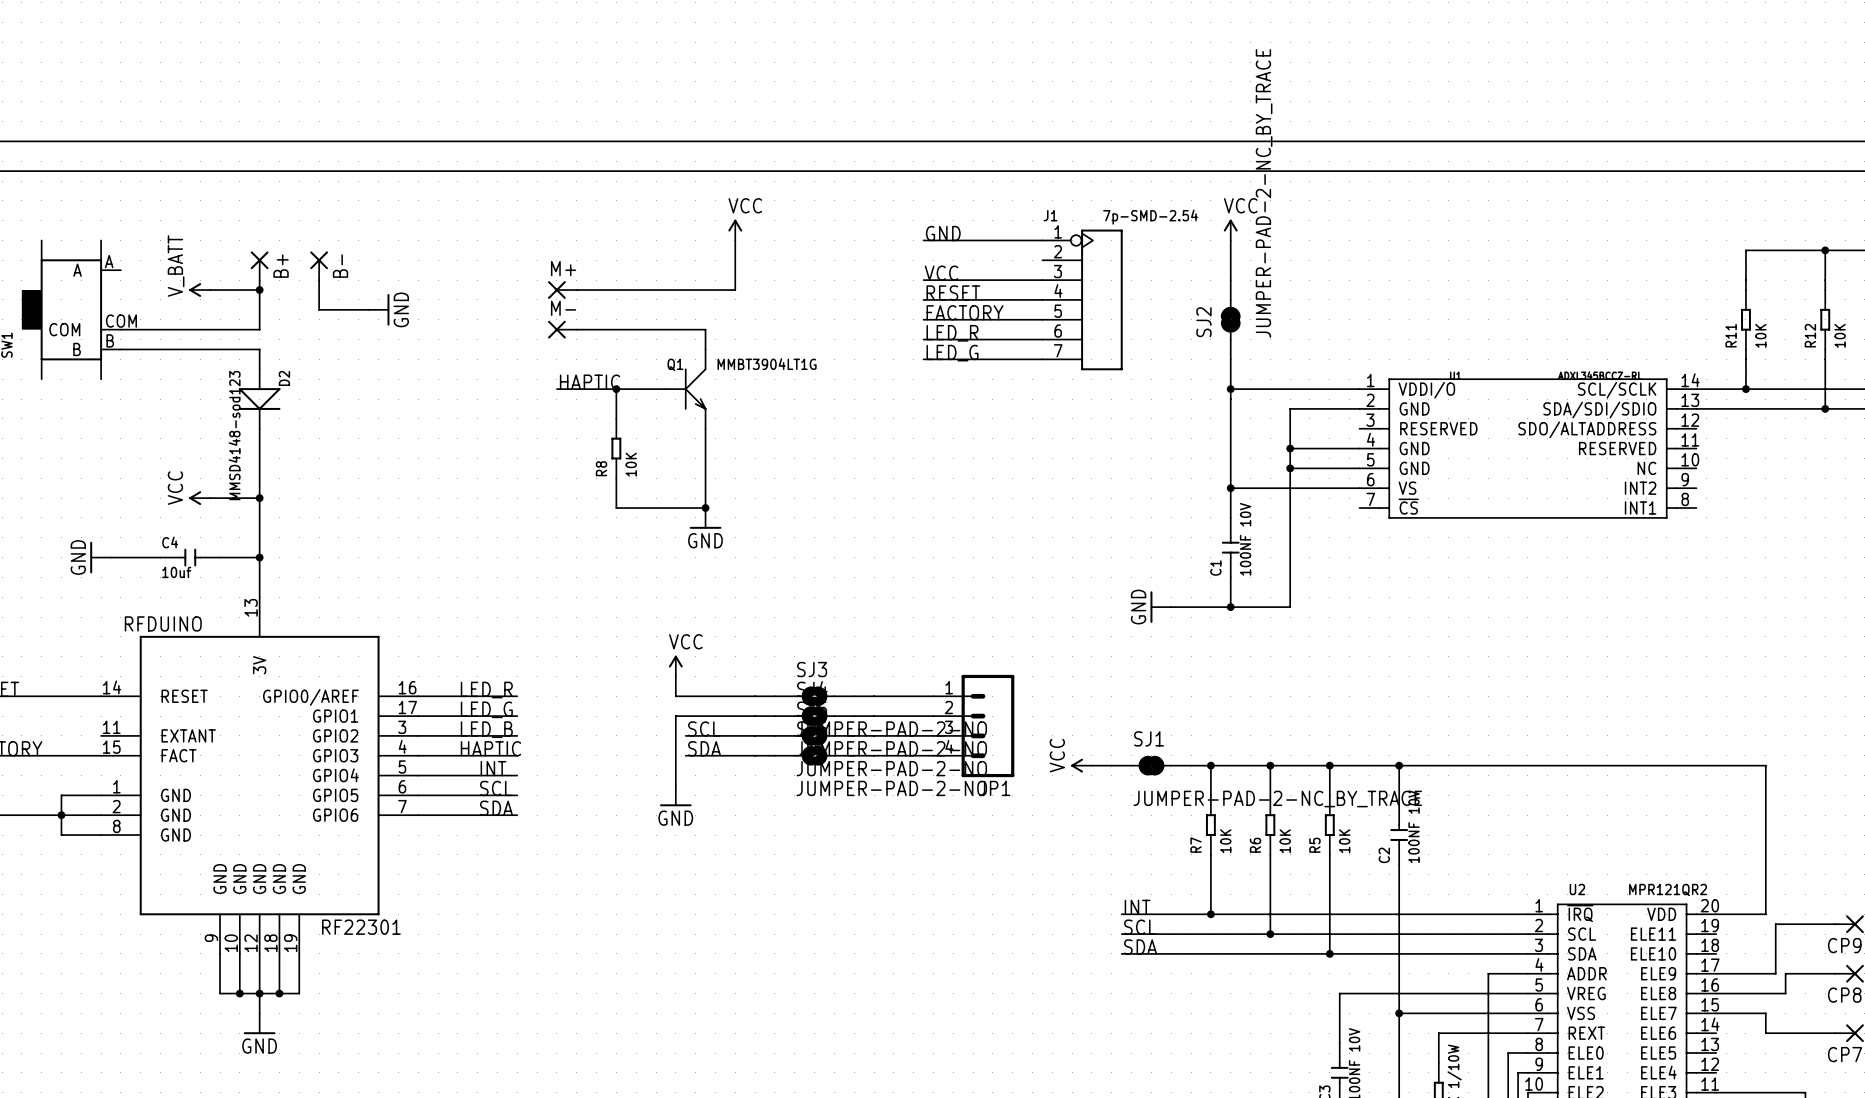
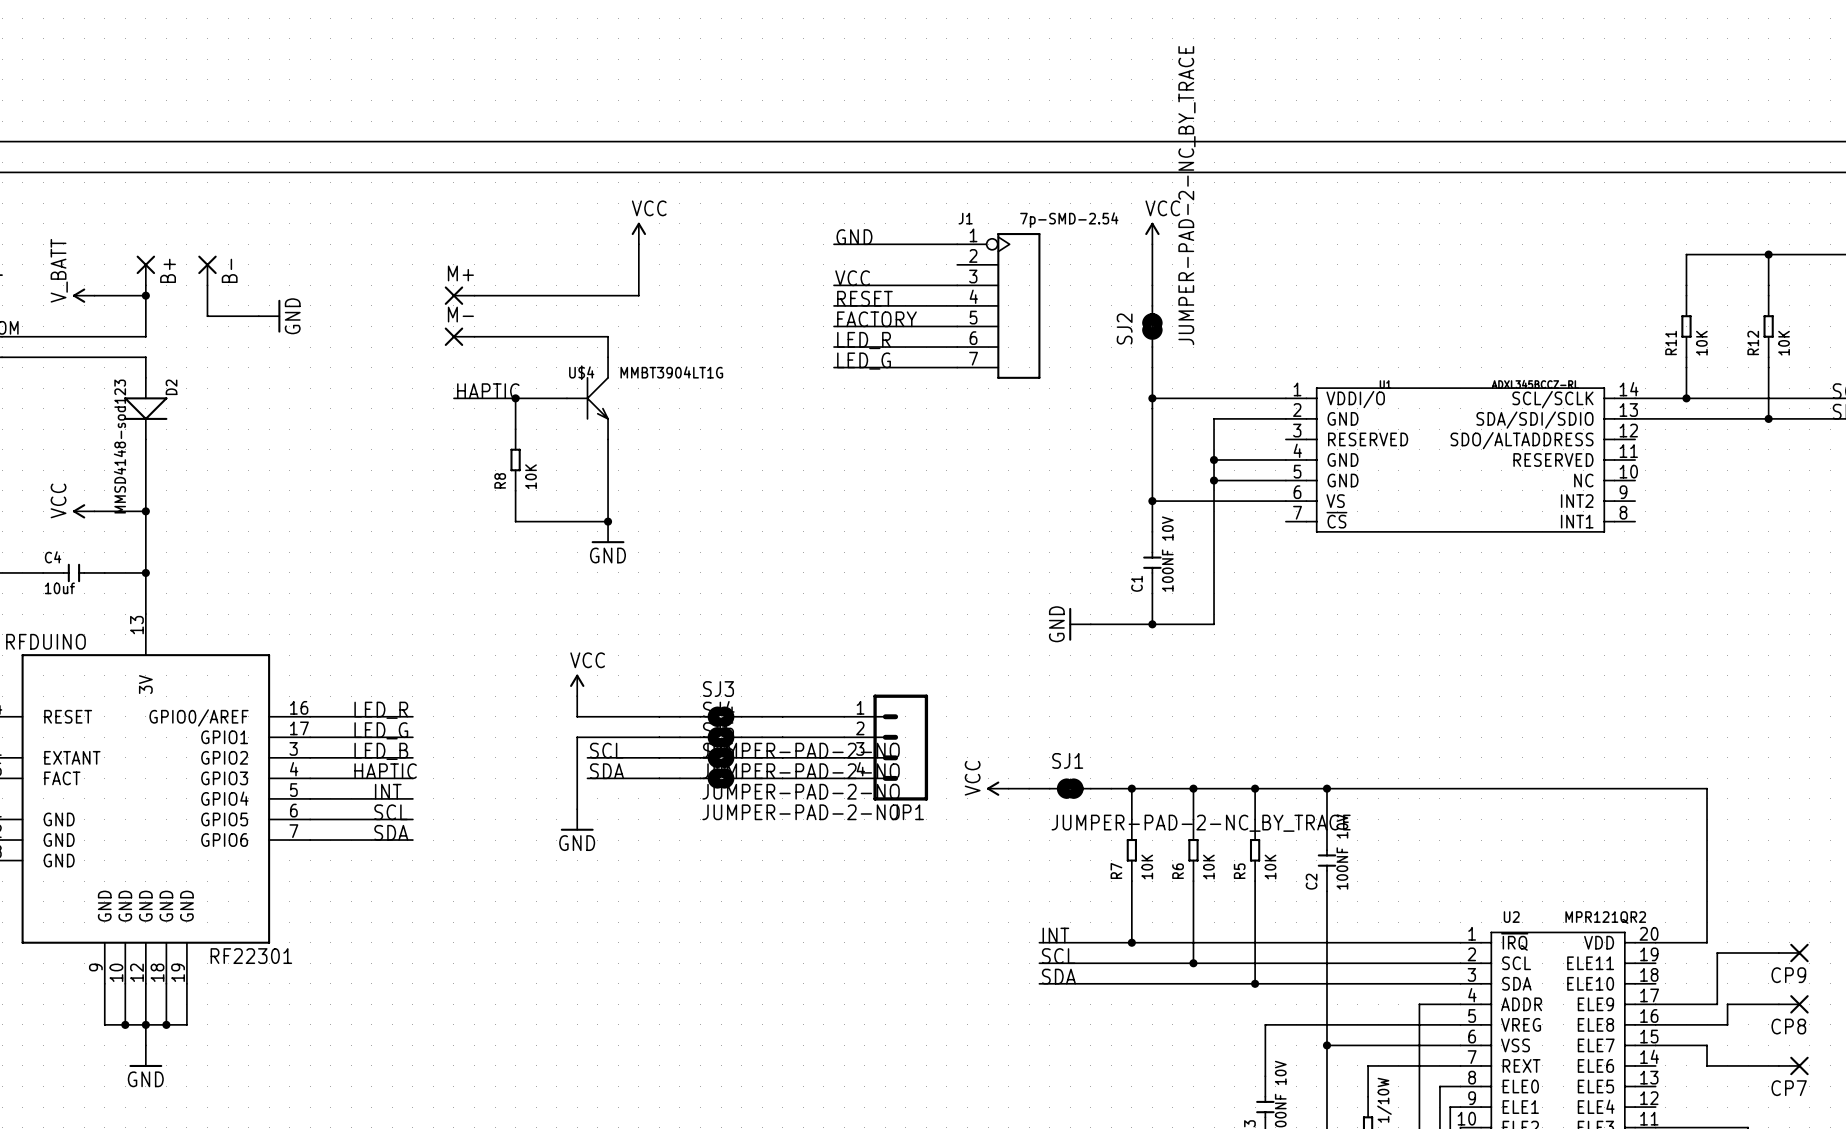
Q1 name: Q1 (675, 364) -> U$4 (581, 372)

